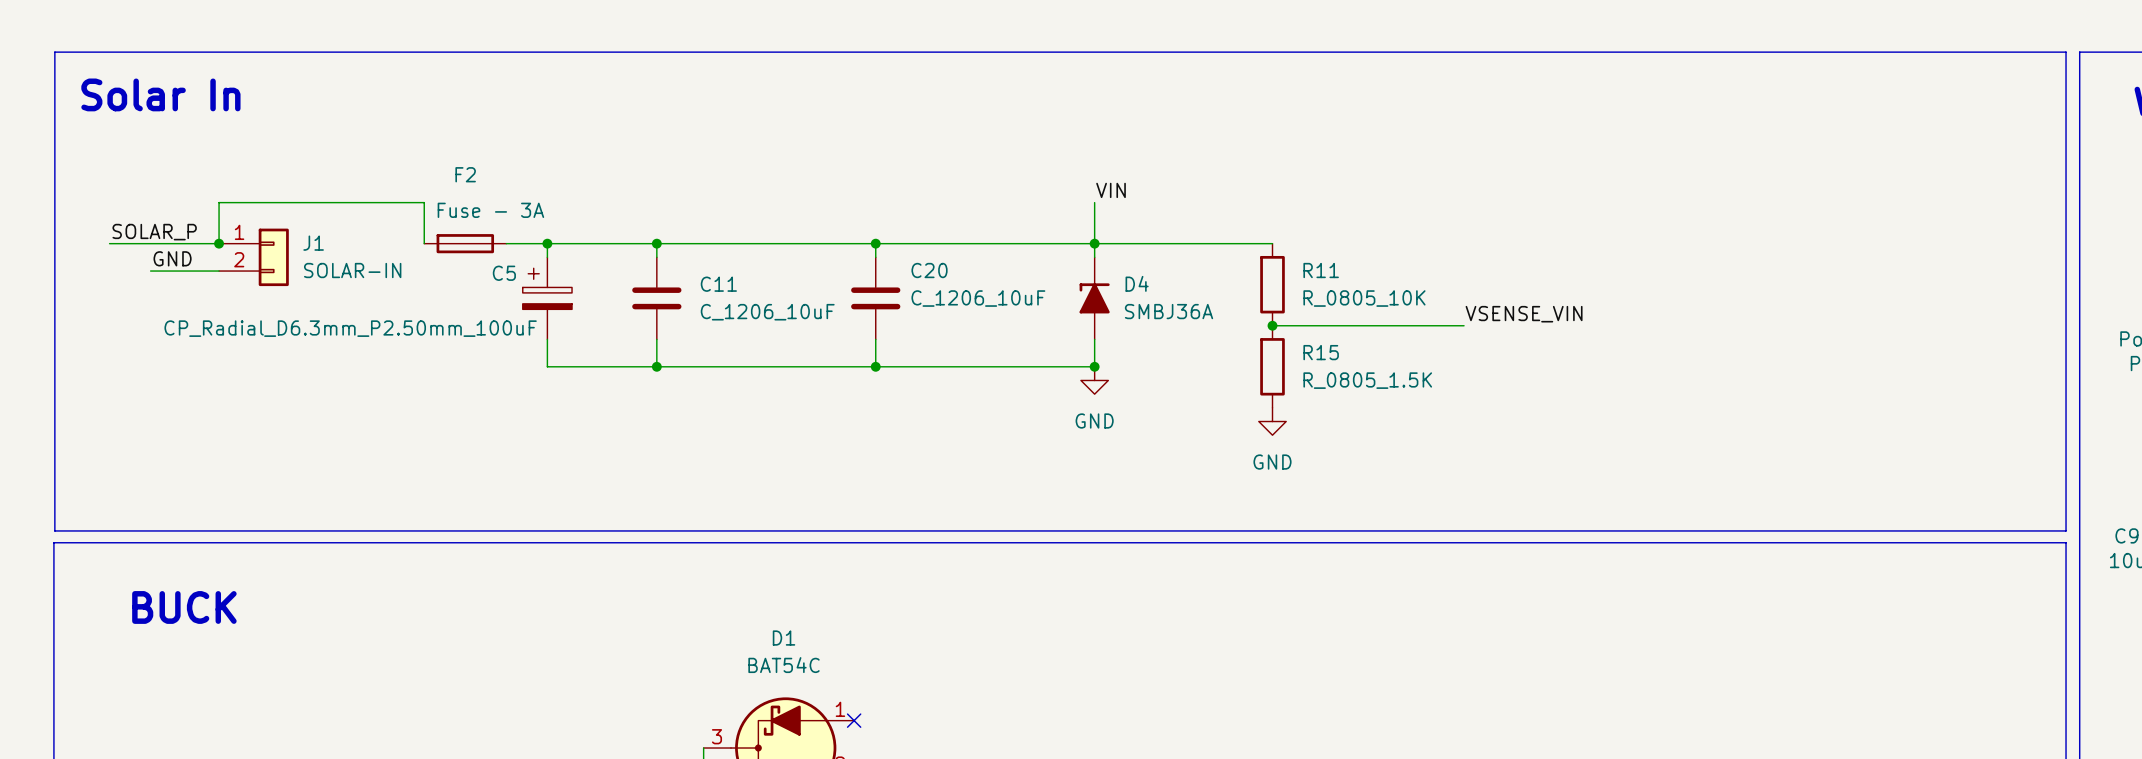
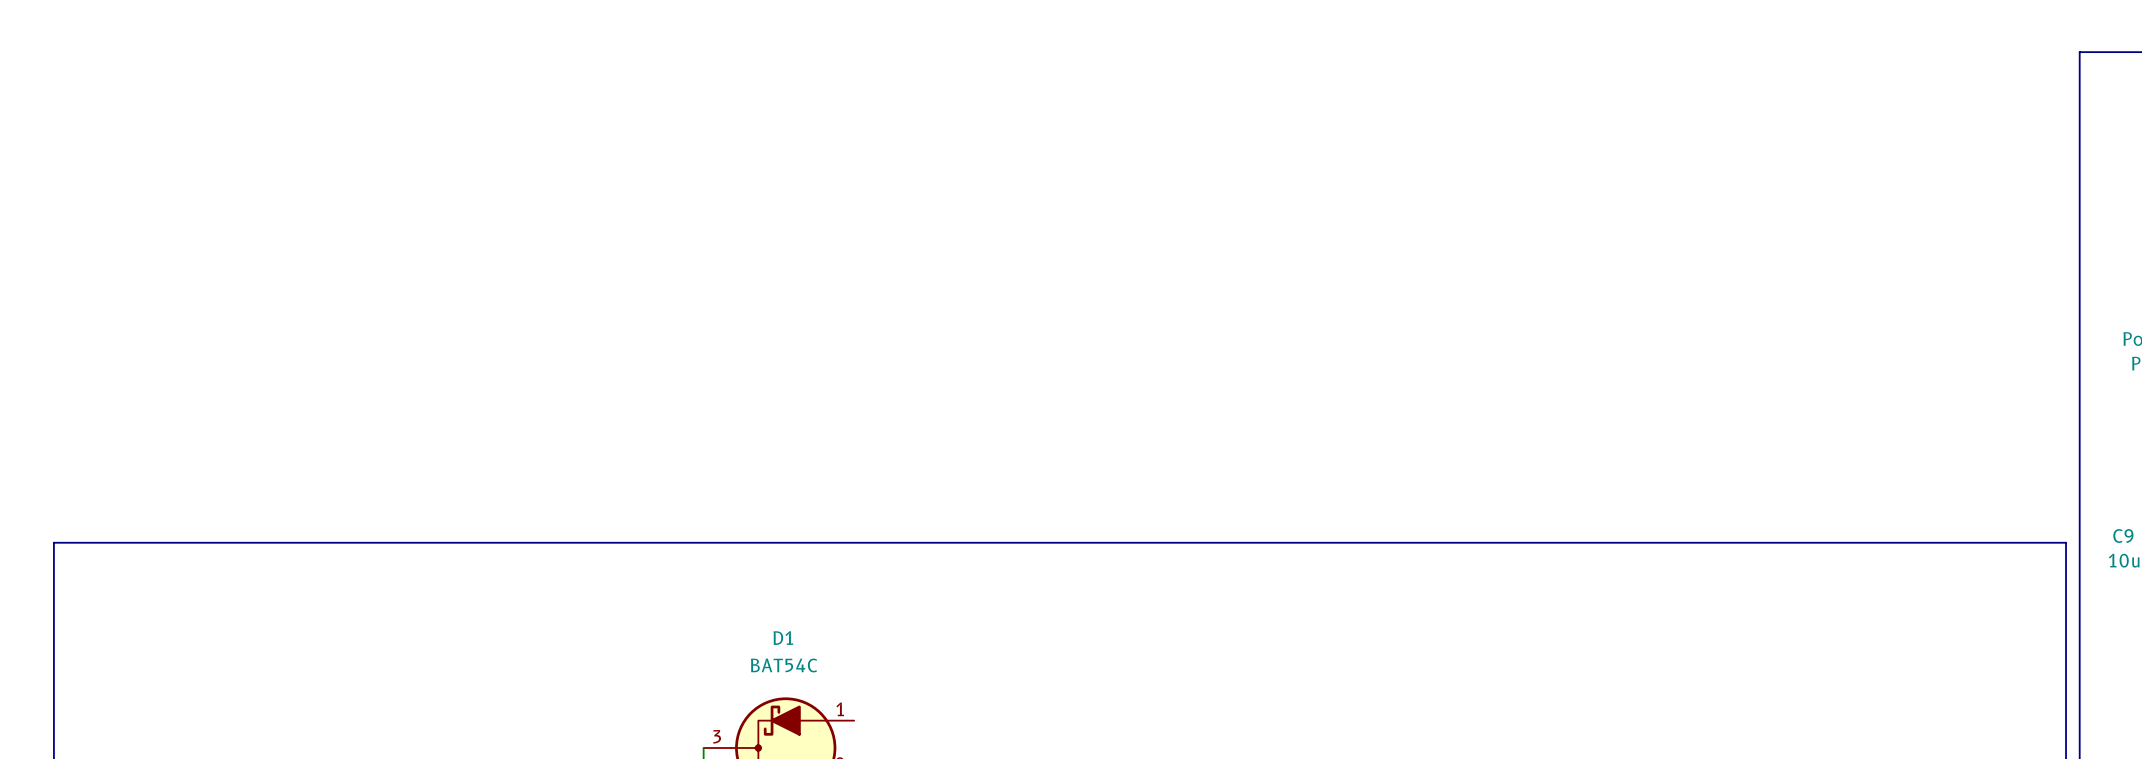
line: (54, 52) (2066, 52) (2066, 530) (54, 530) (54, 52) -> none
text: Solar In (160, 94) -> none
label: VIN (1111, 190) -> none
wire: (1094, 202) (1094, 257) -> none
label: SOLAR_P (154, 232) -> none
wire: (109, 243) (219, 243) (219, 202) (424, 202) (424, 243) -> none
junction: (219, 243) -> none
F2: Fuse - 3A (465, 243) -> none
wire: (506, 243) (1272, 243) -> none
wire: (547, 243) (547, 257) -> none
junction: (547, 243) -> none
wire: (656, 243) (656, 257) -> none
junction: (656, 243) -> none
wire: (875, 243) (875, 257) -> none
junction: (875, 243) -> none
junction: (1094, 243) -> none
J1: SOLAR-IN (253, 257) -> none
label: GND (172, 258) -> none
wire: (150, 271) (219, 271) -> none
R11: R_0805_10K (1272, 284) -> none
C5: CP_Radial_D6.3mm_P2.50mm_100uF (547, 298) -> none
C11: C_1206_10uF (656, 298) -> none
C20: C_1206_10uF (875, 298) -> none
D4: SMBJ36A (1094, 298) -> none
label: VSENSE_VIN (1524, 314) -> none
wire: (1272, 325) (1464, 325) -> none
junction: (1272, 325) -> none
wire: (547, 339) (547, 366) (1094, 366) (1094, 339) -> none
wire: (656, 339) (656, 366) -> none
wire: (875, 339) (875, 366) -> none
junction: (656, 366) -> none
junction: (875, 366) -> none
junction: (1094, 366) -> none
R15: R_0805_1.5K (1272, 366) -> none
power symbol: GND (1094, 380) -> none
power symbol: GND (1272, 421) -> none
text: BUCK (184, 607) -> none
no-connect mark: (854, 720) -> none

